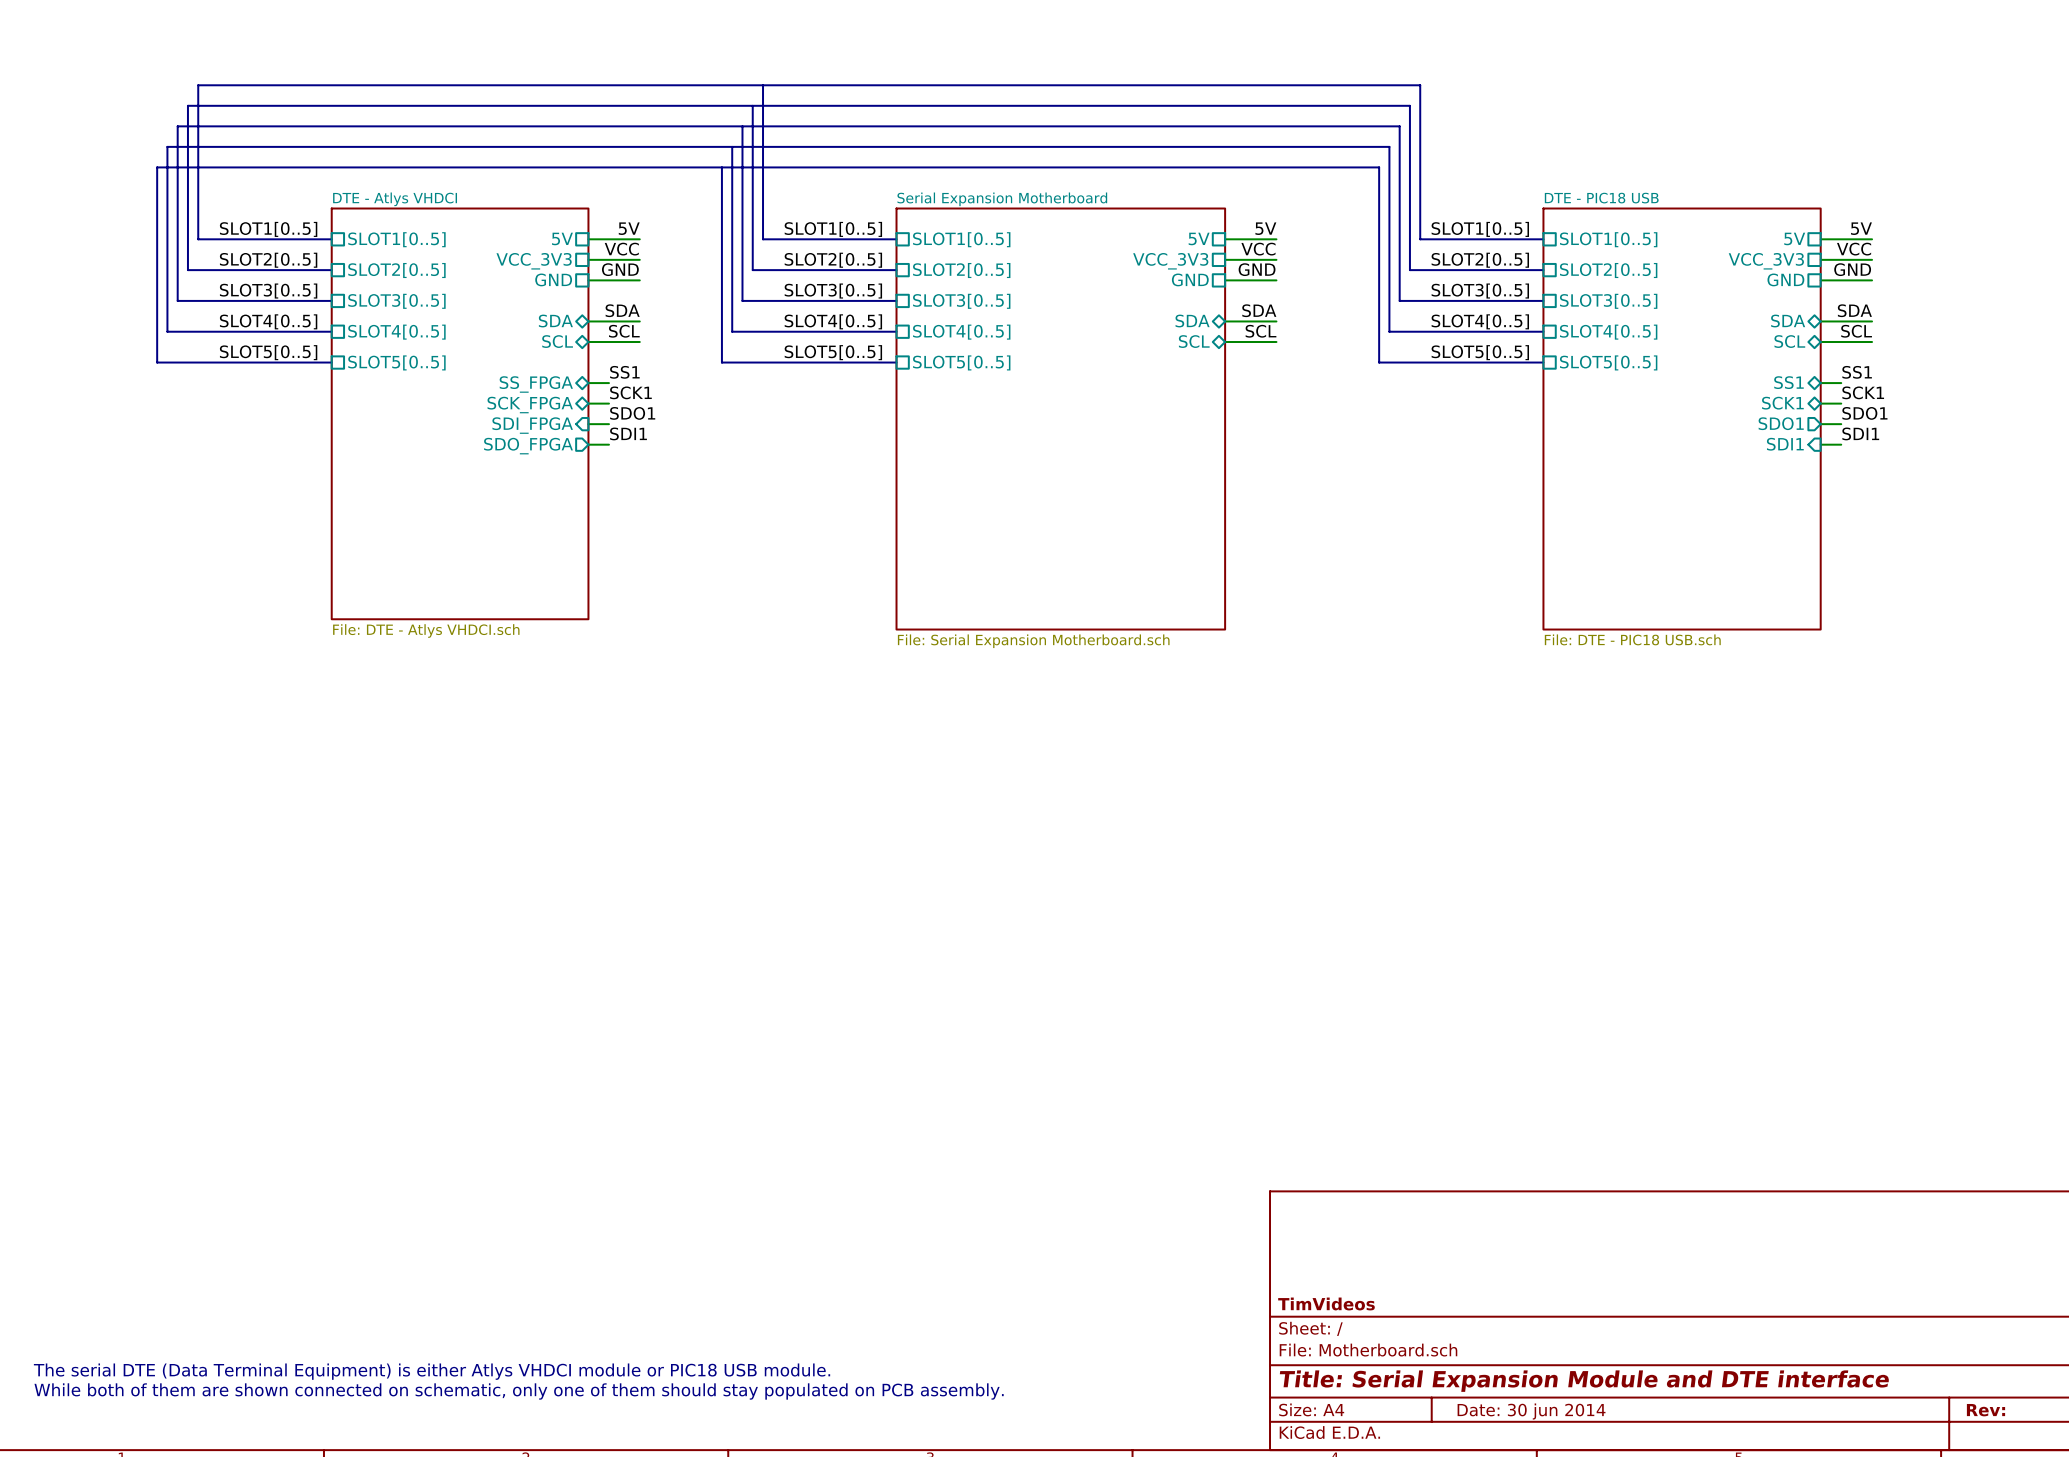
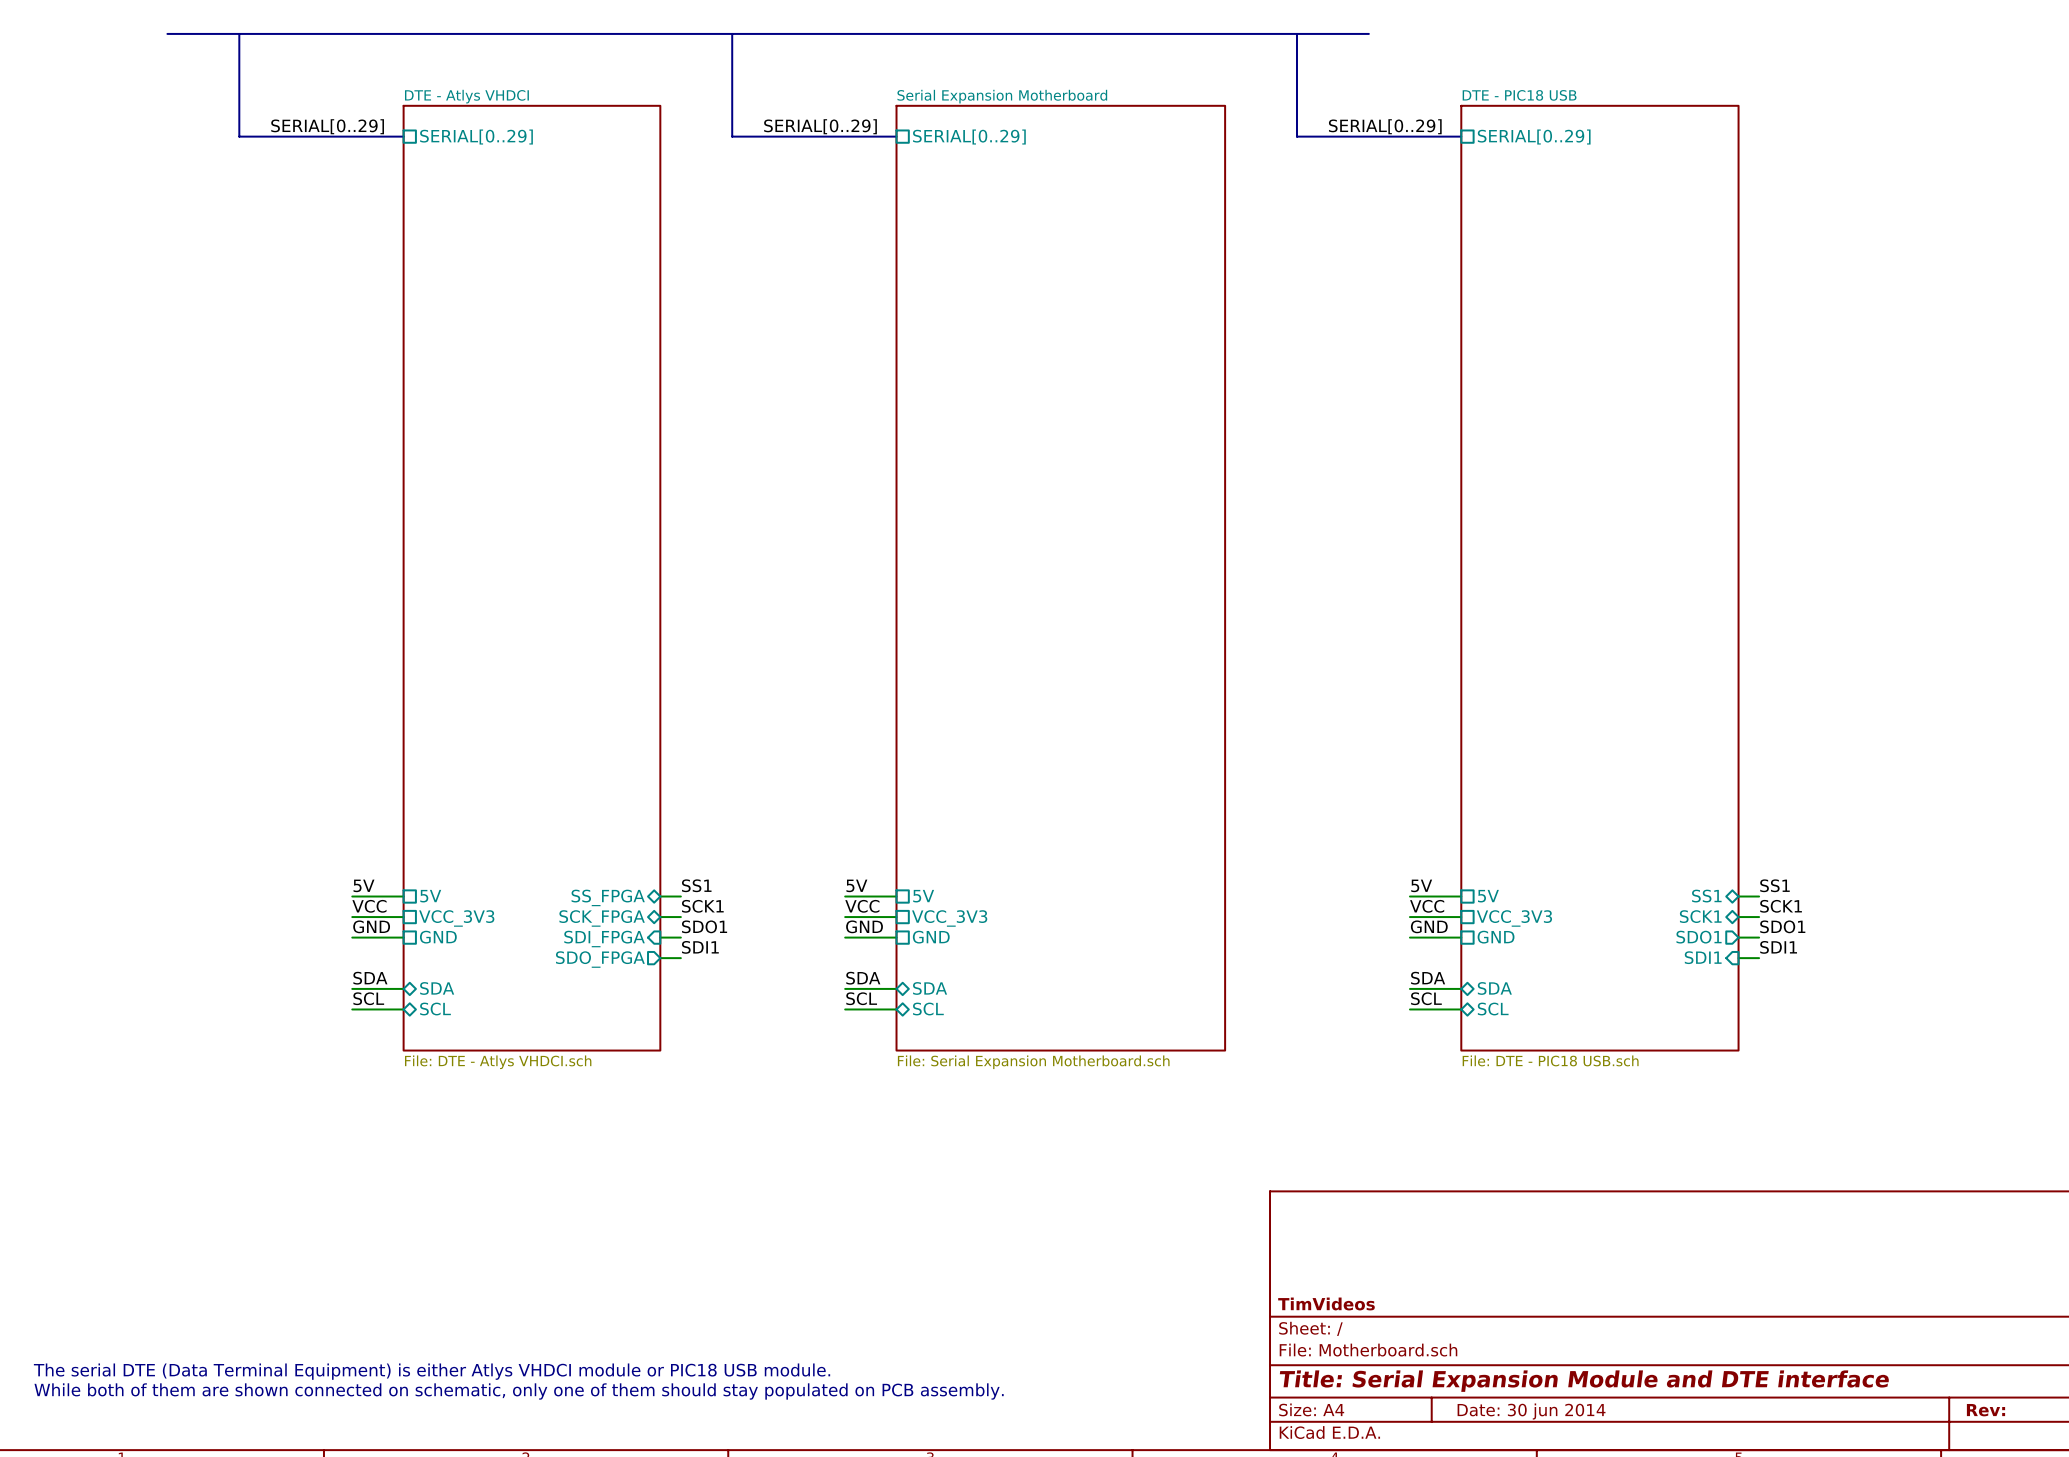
bus: none -> (167, 33) (1368, 33)
bus: none -> (239, 33) (239, 136) (403, 136)
bus: none -> (732, 33) (732, 136) (896, 136)
bus: none -> (1296, 33) (1296, 136) (1461, 136)
bus: (763, 85) (763, 239) (896, 239) -> none
bus: (752, 105) (752, 270) (896, 270) -> none
label: none -> SERIAL[0..29] (327, 126)
bus: (742, 126) (742, 300) (896, 300) -> none
label: none -> SERIAL[0..29] (820, 126)
label: none -> SERIAL[0..29] (1385, 126)
sheet pin: none -> SERIAL[0..29] (476, 137)
sheet pin: none -> SERIAL[0..29] (969, 137)
sheet pin: none -> SERIAL[0..29] (1534, 137)
bus: (732, 146) (732, 331) (896, 331) -> none
bus: (721, 167) (721, 362) (896, 362) -> none
sheet DTE - PIC18 USB name position: DTE - PIC18 USB (1601, 198) -> DTE - PIC18 USB (1519, 95)
sheet DTE - PIC18 USB shape: [1543, 208, 1821, 630] -> [1461, 105, 1739, 1051]
label: 5V (629, 228) -> none
label: 5V (1265, 228) -> none
label: 5V (1861, 228) -> none
label: SLOT1[0..5] (268, 229) -> none
label: SLOT1[0..5] (833, 229) -> none
label: SLOT1[0..5] (1480, 229) -> none
sheet pin: 5V (562, 238) -> none
sheet pin: 5V (1199, 238) -> none
sheet pin: 5V (1794, 238) -> none
bus: (331, 239) (198, 239) (198, 85) (1420, 85) (1420, 239) (1543, 239) -> none
sheet pin: SLOT1[0..5] (396, 239) -> none
wire: (588, 239) (639, 239) -> none
sheet pin: SLOT1[0..5] (961, 239) -> none
wire: (1225, 239) (1276, 239) -> none
sheet pin: SLOT1[0..5] (1608, 239) -> none
wire: (1820, 239) (1872, 239) -> none
label: VCC (621, 249) -> none
label: VCC (1258, 249) -> none
label: VCC (1854, 249) -> none
wire: (588, 259) (639, 259) -> none
wire: (1225, 259) (1276, 259) -> none
wire: (1820, 259) (1872, 259) -> none
label: SLOT2[0..5] (268, 260) -> none
label: SLOT2[0..5] (833, 260) -> none
label: SLOT2[0..5] (1480, 260) -> none
sheet pin: VCC_3V3 (534, 261) -> none
sheet pin: VCC_3V3 (1170, 261) -> none
sheet pin: VCC_3V3 (1766, 261) -> none
label: GND (620, 269) -> none
label: GND (1257, 269) -> none
label: GND (1852, 269) -> none
bus: (331, 270) (187, 270) (187, 105) (1409, 105) (1409, 270) (1543, 270) -> none
sheet pin: SLOT2[0..5] (396, 270) -> none
sheet pin: SLOT2[0..5] (961, 270) -> none
sheet pin: SLOT2[0..5] (1608, 270) -> none
sheet pin: GND (553, 279) -> none
sheet pin: GND (1190, 279) -> none
sheet pin: GND (1785, 279) -> none
wire: (588, 280) (639, 280) -> none
wire: (1225, 280) (1276, 280) -> none
wire: (1820, 280) (1872, 280) -> none
label: SLOT3[0..5] (268, 291) -> none
label: SLOT3[0..5] (833, 291) -> none
label: SLOT3[0..5] (1480, 291) -> none
bus: (331, 300) (177, 300) (177, 126) (1399, 126) (1399, 300) (1543, 300) -> none
sheet pin: SLOT3[0..5] (396, 301) -> none
sheet pin: SLOT3[0..5] (961, 301) -> none
sheet pin: SLOT3[0..5] (1608, 301) -> none
label: SDA (622, 310) -> none
label: SDA (1259, 310) -> none
label: SDA (1854, 310) -> none
label: SLOT4[0..5] (268, 321) -> none
sheet pin: SDA (555, 321) -> none
wire: (588, 321) (639, 321) -> none
label: SLOT4[0..5] (833, 321) -> none
sheet pin: SDA (1192, 321) -> none
wire: (1225, 321) (1276, 321) -> none
label: SLOT4[0..5] (1480, 321) -> none
sheet pin: SDA (1788, 321) -> none
wire: (1820, 321) (1872, 321) -> none
bus: (331, 331) (167, 331) (167, 146) (1389, 146) (1389, 331) (1543, 331) -> none
label: SCL (624, 331) -> none
label: SCL (1260, 331) -> none
label: SCL (1856, 331) -> none
sheet pin: SLOT4[0..5] (396, 332) -> none
sheet pin: SLOT4[0..5] (961, 332) -> none
sheet pin: SLOT4[0..5] (1608, 332) -> none
sheet pin: SCL (557, 341) -> none
sheet pin: SCL (1194, 341) -> none
sheet pin: SCL (1789, 341) -> none
wire: (588, 342) (639, 342) -> none
wire: (1225, 342) (1276, 342) -> none
wire: (1820, 342) (1872, 342) -> none
label: SLOT5[0..5] (268, 352) -> none
label: SLOT5[0..5] (833, 352) -> none
label: SLOT5[0..5] (1480, 352) -> none
bus: (331, 362) (157, 362) (157, 167) (1379, 167) (1379, 362) (1543, 362) -> none
sheet pin: SLOT5[0..5] (396, 362) -> none
sheet pin: SLOT5[0..5] (961, 362) -> none
sheet pin: SLOT5[0..5] (1608, 362) -> none
label: SS1 (624, 372) -> none
label: SS1 (1857, 372) -> none
sheet pin: SS1 (1788, 382) -> none
wire: (588, 383) (608, 383) -> none
wire: (1820, 383) (1841, 383) -> none
sheet pin: SS_FPGA (536, 384) -> none
label: SCK1 (630, 392) -> none
label: SCK1 (1863, 392) -> none
wire: (588, 403) (608, 403) -> none
sheet pin: SCK1 (1782, 403) -> none
wire: (1820, 403) (1841, 403) -> none
sheet pin: SCK_FPGA (530, 405) -> none
sheet DTE - Atlys VHDCI: File: DTE - Atlys VHDCI.sch (460, 413) -> none
label: SDO1 (632, 413) -> none
label: SDO1 (1864, 413) -> none
sheet Serial Expansion Motherboard: File: Serial Expansion Motherboard.sch (1060, 419) -> none
sheet pin: SDO1 (1781, 423) -> none
wire: (588, 424) (608, 424) -> none
wire: (1820, 424) (1841, 424) -> none
sheet pin: SDI_FPGA (532, 425) -> none
label: SDI1 (628, 433) -> none
label: SDI1 (1860, 433) -> none
wire: (588, 444) (608, 444) -> none
sheet pin: SDI1 (1785, 444) -> none
wire: (1820, 444) (1841, 444) -> none
sheet pin: SDO_FPGA (528, 446) -> none
sheet DTE - Atlys VHDCI: none -> File: DTE - Atlys VHDCI.sch (531, 578)
sheet Serial Expansion Motherboard: none -> File: Serial Expansion Motherboard.sch (1060, 578)
sheet DTE - PIC18 USB value position: File: DTE - PIC18 USB.sch (1632, 639) -> File: DTE - PIC18 USB.sch (1550, 1060)
label: none -> 5V (364, 885)
label: none -> SS1 (696, 885)
label: none -> 5V (856, 885)
label: none -> 5V (1421, 885)
label: none -> SS1 (1774, 885)
wire: none -> (352, 896) (403, 896)
sheet pin: none -> 5V (430, 896)
wire: none -> (660, 896) (680, 896)
wire: none -> (845, 896) (896, 896)
sheet pin: none -> 5V (923, 896)
wire: none -> (1409, 896) (1461, 896)
sheet pin: none -> 5V (1488, 896)
sheet pin: none -> SS1 (1706, 896)
wire: none -> (1738, 896) (1759, 896)
sheet pin: none -> SS_FPGA (608, 897)
label: none -> VCC (369, 906)
label: none -> SCK1 (702, 906)
label: none -> VCC (862, 906)
label: none -> VCC (1427, 906)
label: none -> SCK1 (1781, 906)
sheet pin: none -> SCK1 (1700, 916)
wire: none -> (352, 917) (403, 917)
wire: none -> (660, 917) (680, 917)
wire: none -> (845, 917) (896, 917)
wire: none -> (1409, 917) (1461, 917)
wire: none -> (1738, 917) (1759, 917)
sheet pin: none -> VCC_3V3 (456, 918)
sheet pin: none -> SCK_FPGA (602, 918)
sheet pin: none -> VCC_3V3 (949, 918)
sheet pin: none -> VCC_3V3 (1514, 918)
label: none -> GND (371, 926)
label: none -> SDO1 (704, 926)
label: none -> GND (864, 926)
label: none -> GND (1429, 926)
label: none -> SDO1 (1782, 926)
wire: none -> (352, 937) (403, 937)
sheet pin: none -> GND (438, 937)
wire: none -> (660, 937) (680, 937)
wire: none -> (845, 937) (896, 937)
sheet pin: none -> GND (931, 937)
wire: none -> (1409, 937) (1461, 937)
sheet pin: none -> GND (1496, 937)
sheet pin: none -> SDO1 (1699, 937)
wire: none -> (1738, 937) (1759, 937)
sheet pin: none -> SDI_FPGA (604, 939)
label: none -> SDI1 (700, 947)
label: none -> SDI1 (1778, 947)
sheet pin: none -> SDI1 (1703, 957)
wire: none -> (660, 958) (680, 958)
wire: none -> (1738, 958) (1759, 958)
sheet pin: none -> SDO_FPGA (600, 959)
label: none -> SDA (370, 978)
label: none -> SDA (863, 978)
label: none -> SDA (1428, 978)
wire: none -> (352, 988) (403, 988)
sheet pin: none -> SDA (437, 988)
wire: none -> (845, 988) (896, 988)
sheet pin: none -> SDA (930, 988)
wire: none -> (1409, 988) (1461, 988)
sheet pin: none -> SDA (1494, 988)
label: none -> SCL (368, 998)
label: none -> SCL (861, 998)
label: none -> SCL (1426, 998)
wire: none -> (352, 1009) (403, 1009)
sheet pin: none -> SCL (435, 1009)
wire: none -> (845, 1009) (896, 1009)
sheet pin: none -> SCL (928, 1009)
wire: none -> (1409, 1009) (1461, 1009)
sheet pin: none -> SCL (1493, 1009)

